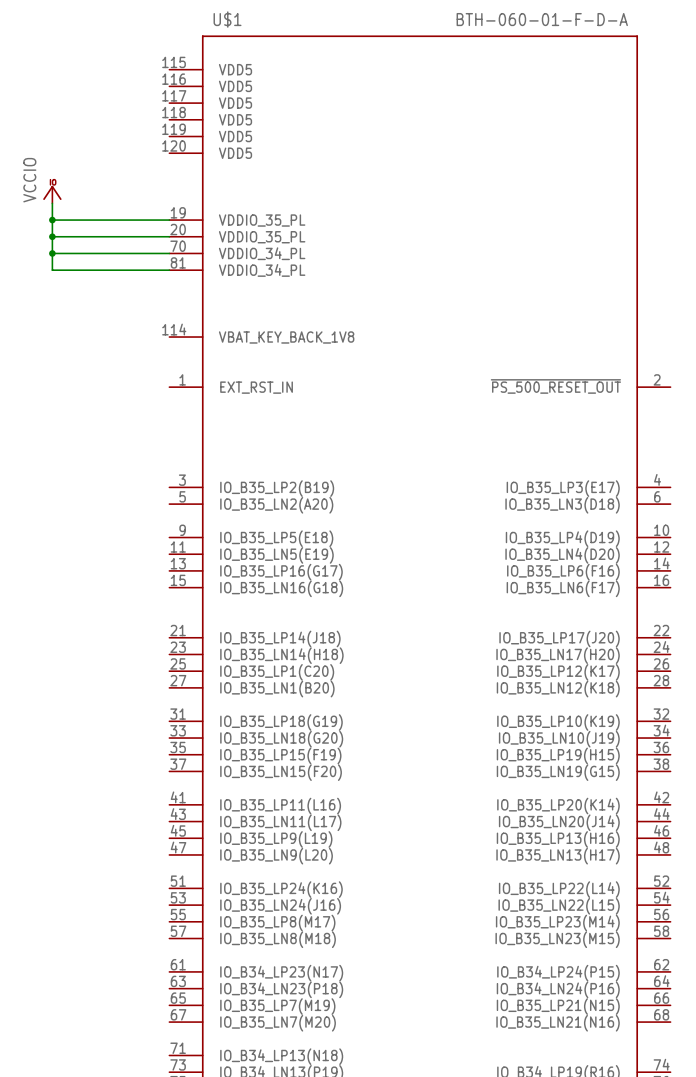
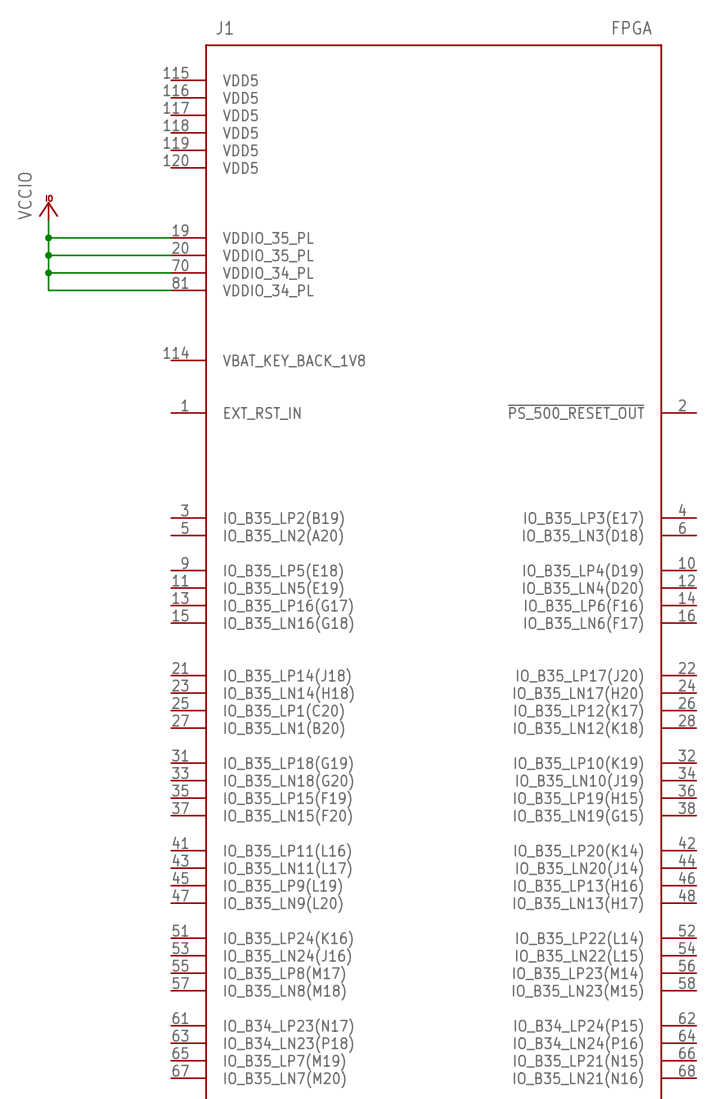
U$1 name: U$1 (227, 19) -> J1 (224, 27)
U$1 value: BTH-060-01-F-D-A (542, 19) -> FPGA (632, 27)

